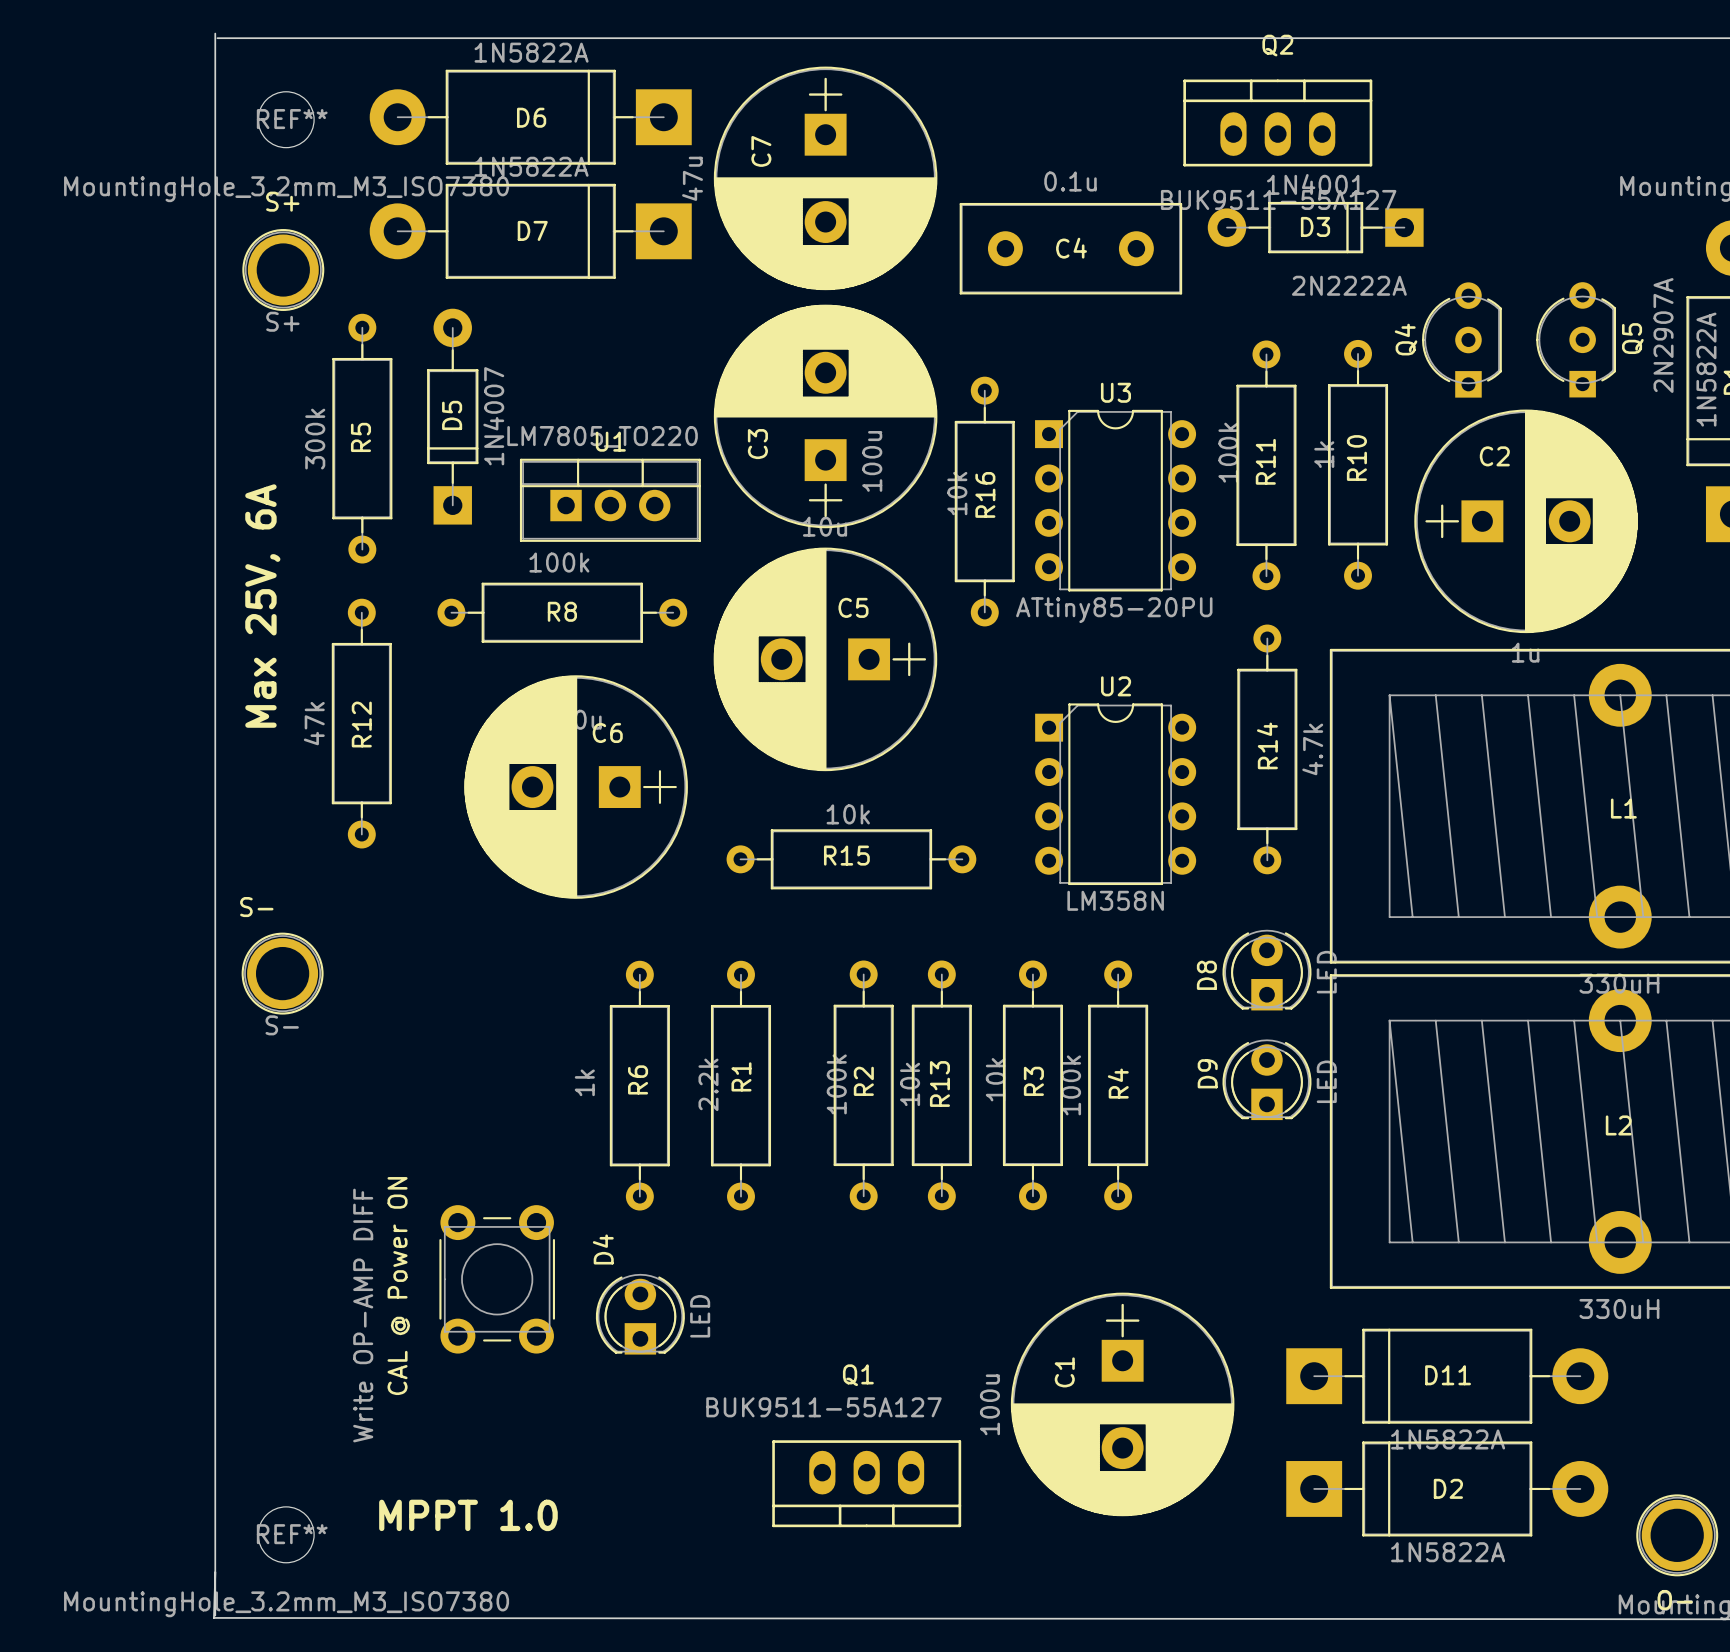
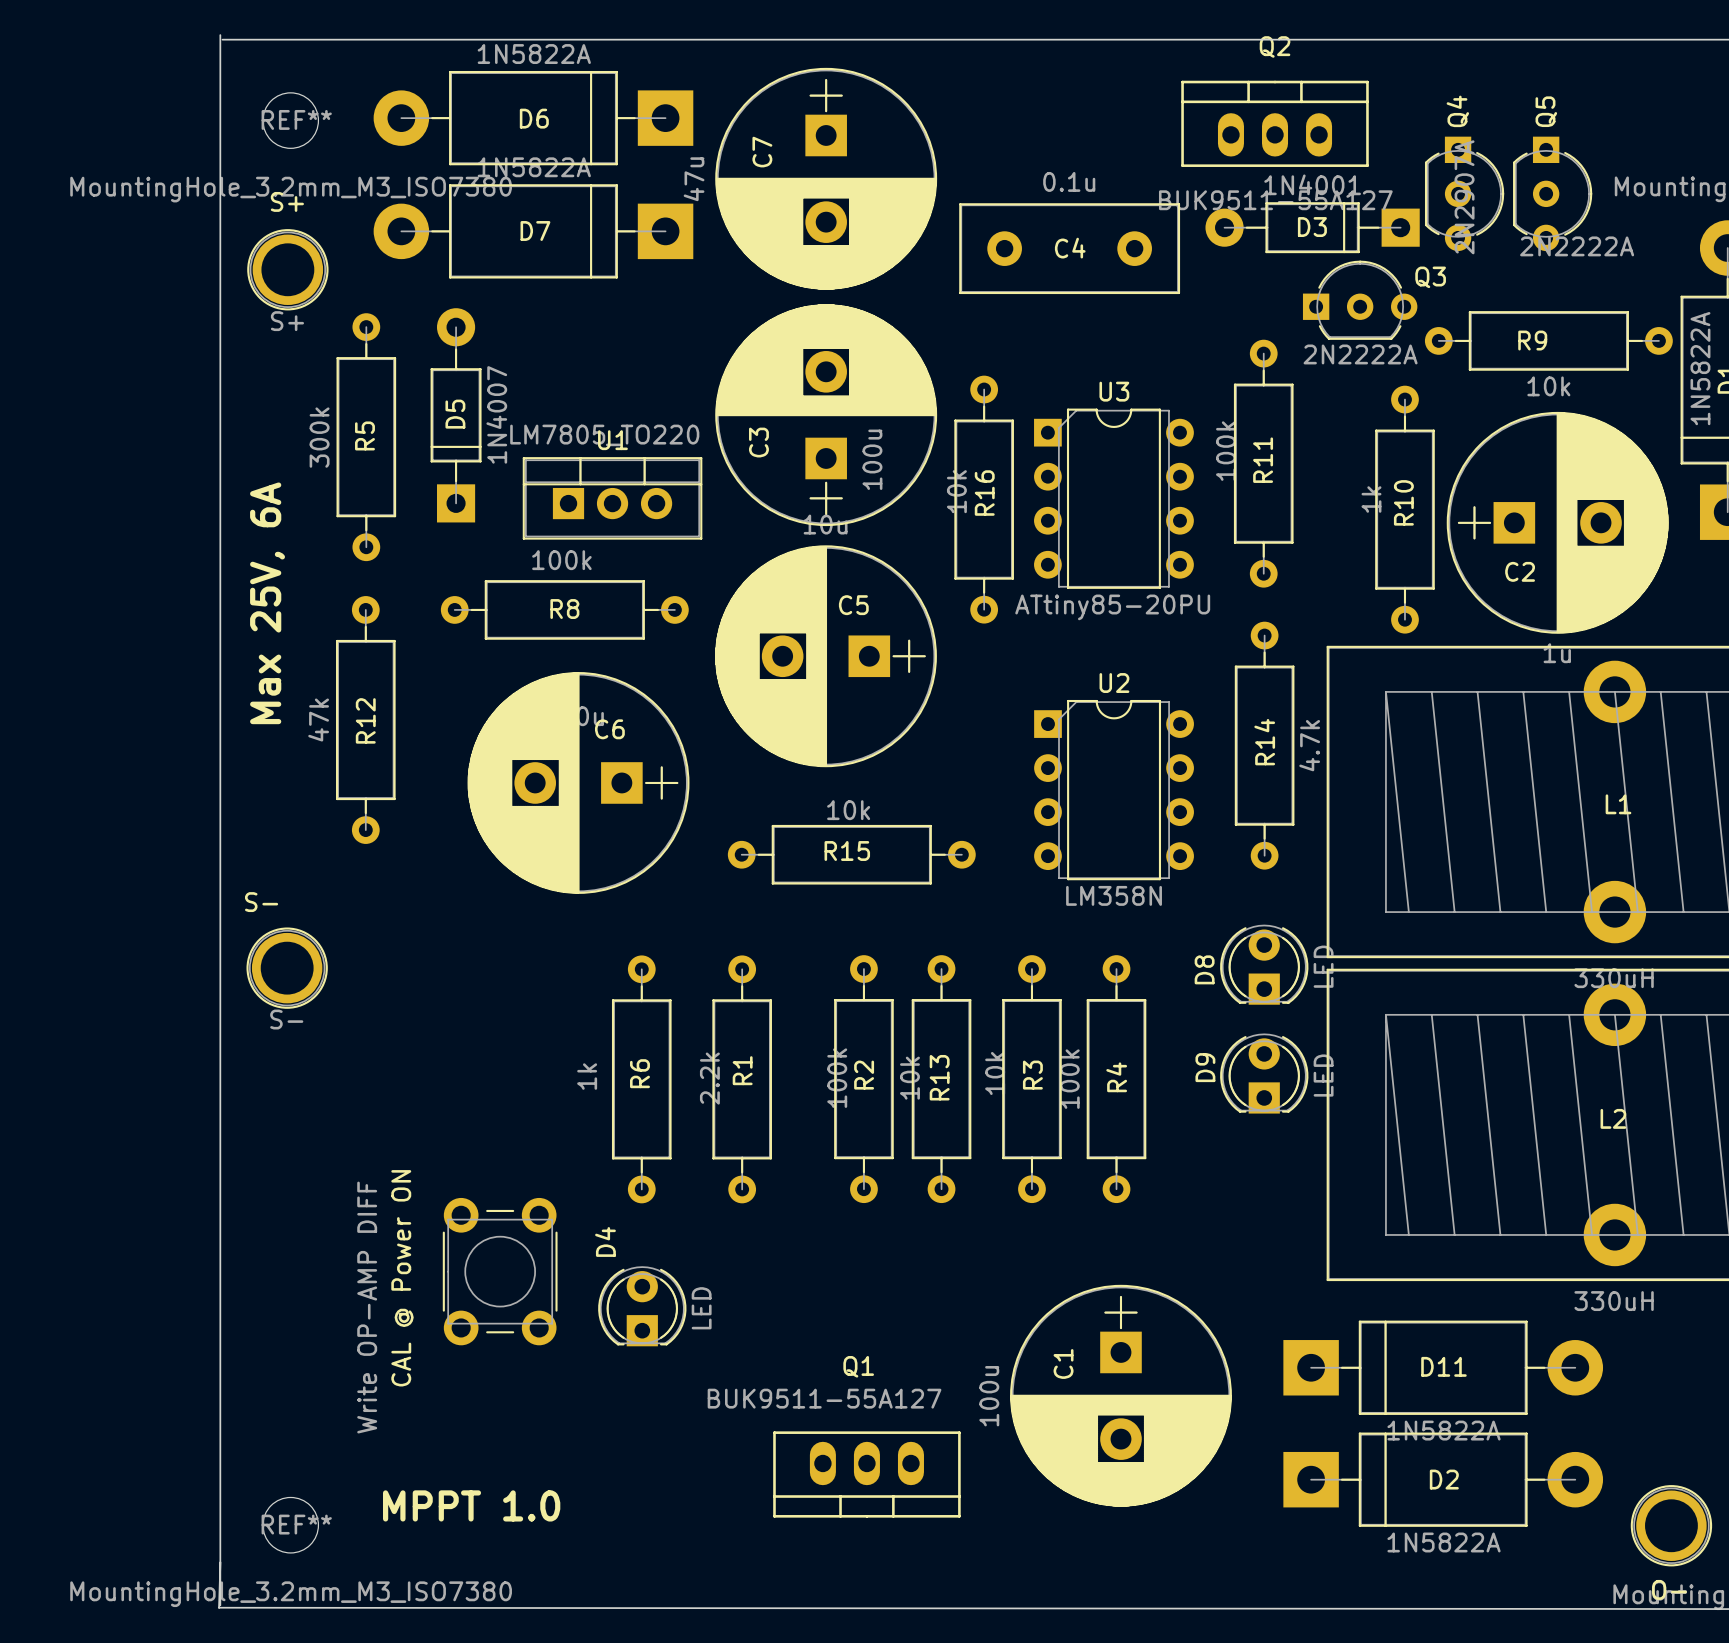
Q3: none -> 2N2222A (1360, 300)
Q5 name position: Q5 (1632, 338) -> Q5 (1546, 111)
Q4 name position: Q4 (1406, 339) -> Q4 (1457, 111)
Q4 rotation: 0° (1461, 339) -> 180° (1464, 193)
Q4 position: (1461, 339) -> (1464, 193)
Q5 rotation: 0° (1576, 339) -> 180° (1552, 193)
Q5 position: (1576, 339) -> (1552, 193)
R9: none -> 10k (1548, 340)
C2 name position: C2 (1494, 456) -> C2 (1520, 571)
R10 position: (1358, 464) -> (1404, 509)
C2 position: (1526, 521) -> (1557, 522)

